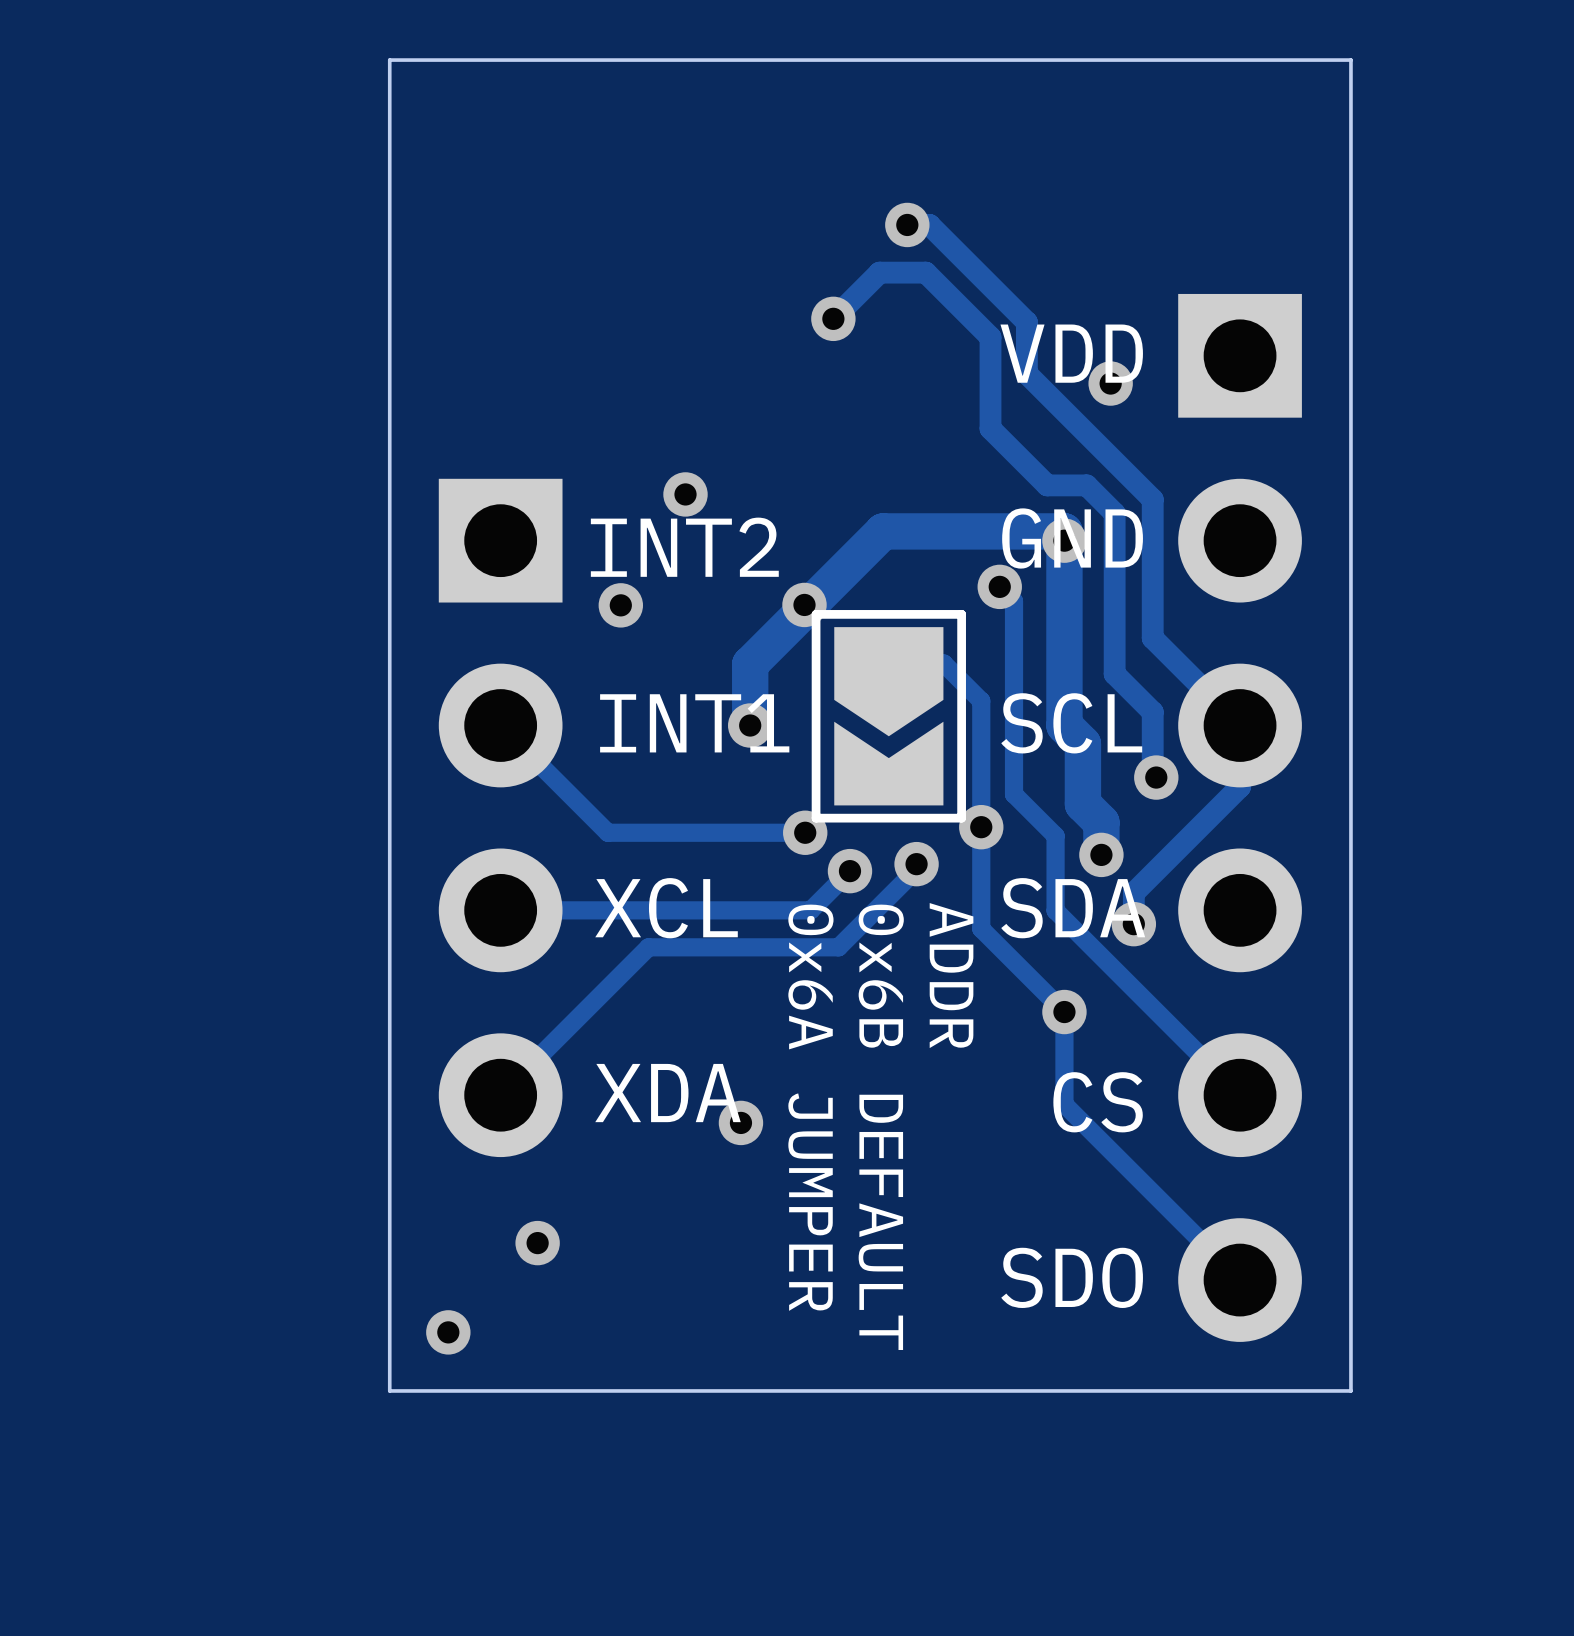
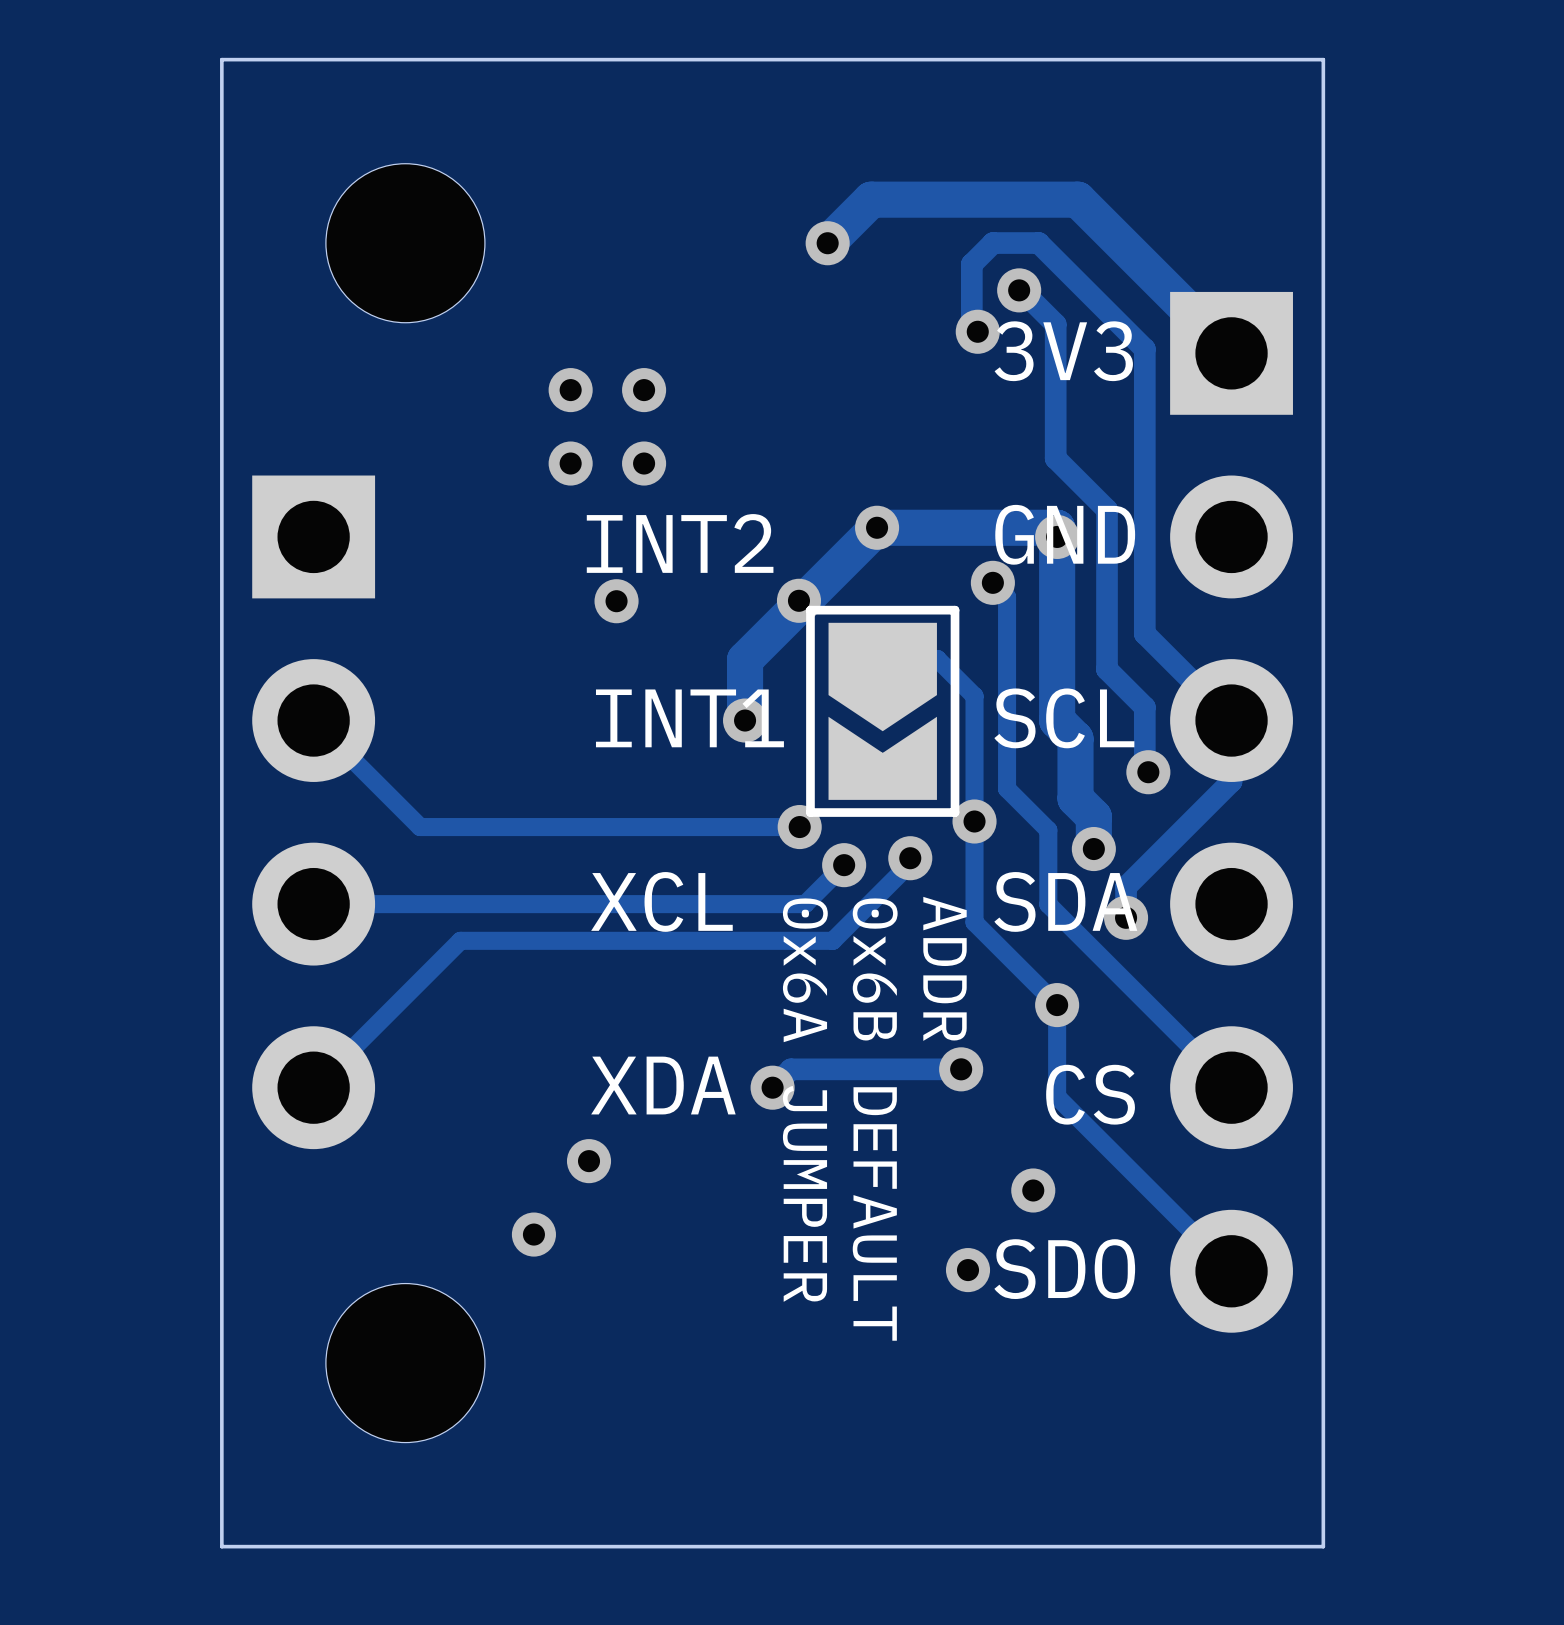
board edge: (1332, 60) (1350, 60) (1350, 1390) (389, 1390) (389, 60) -> (1323, 59) (1323, 1546) (221, 1546) (221, 59) (387, 59)
track: (907, 224) (929, 224) (1026, 322) (1026, 373) (1152, 499) -> (977, 331) (971, 325) (971, 264) (993, 243) (1038, 243) (1144, 349) (1144, 496)
via: (907, 224) -> none
part: none -> (405, 243)
track: none -> (827, 243) (871, 199) (1077, 199) (1231, 353)
via: none -> (827, 243)
via: none -> (1019, 290)
track: (833, 318) (879, 272) (925, 272) (990, 337) (990, 428) (1047, 485) (1086, 485) -> (1019, 290) (1021, 290) (1055, 324) (1055, 458) (1079, 482)
via: (833, 318) -> none
via: none -> (977, 331)
text: VDD (1071, 353) -> 3V3 (1063, 351)
via: (1110, 383) -> none
via: none -> (570, 390)
via: none -> (644, 390)
via: none -> (570, 463)
via position: (685, 494) -> (644, 463)
via: none -> (877, 527)
track: (500, 725) (607, 832) -> (313, 720) (420, 827) (603, 827)
part position: (500, 817) -> (313, 812)
track: none -> (497, 904) (313, 904)
track: (648, 947) (500, 1095) -> (644, 940) (460, 940) (313, 1087)
track: none -> (961, 1069) (790, 1069) (772, 1087)
via: none -> (961, 1069)
via position: (740, 1122) -> (772, 1087)
via: none -> (589, 1161)
via: none -> (1033, 1190)
via: none -> (968, 1270)
via: (448, 1332) -> none
part: none -> (405, 1363)

